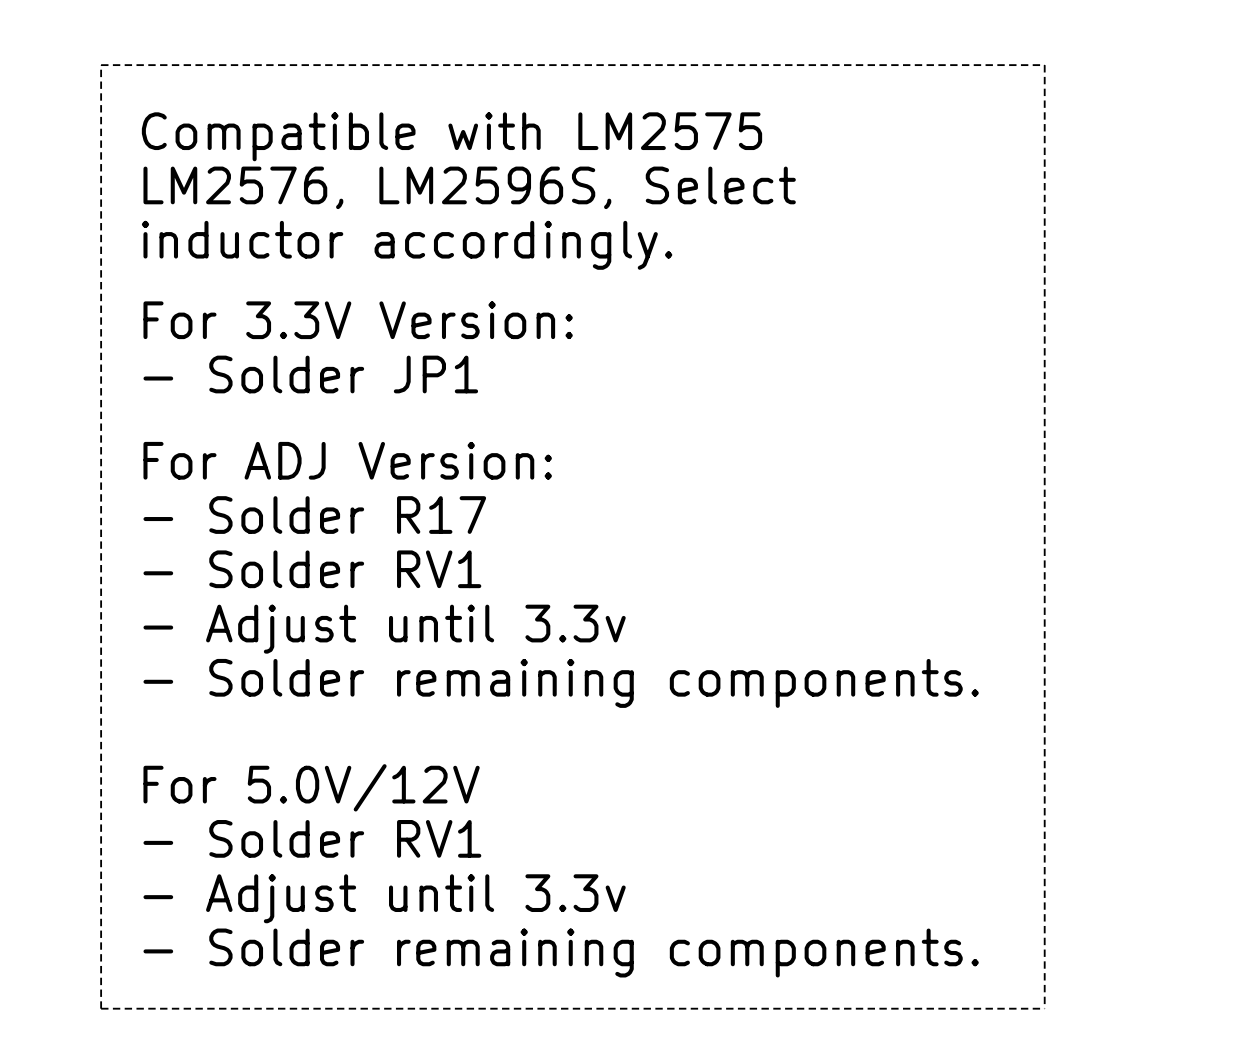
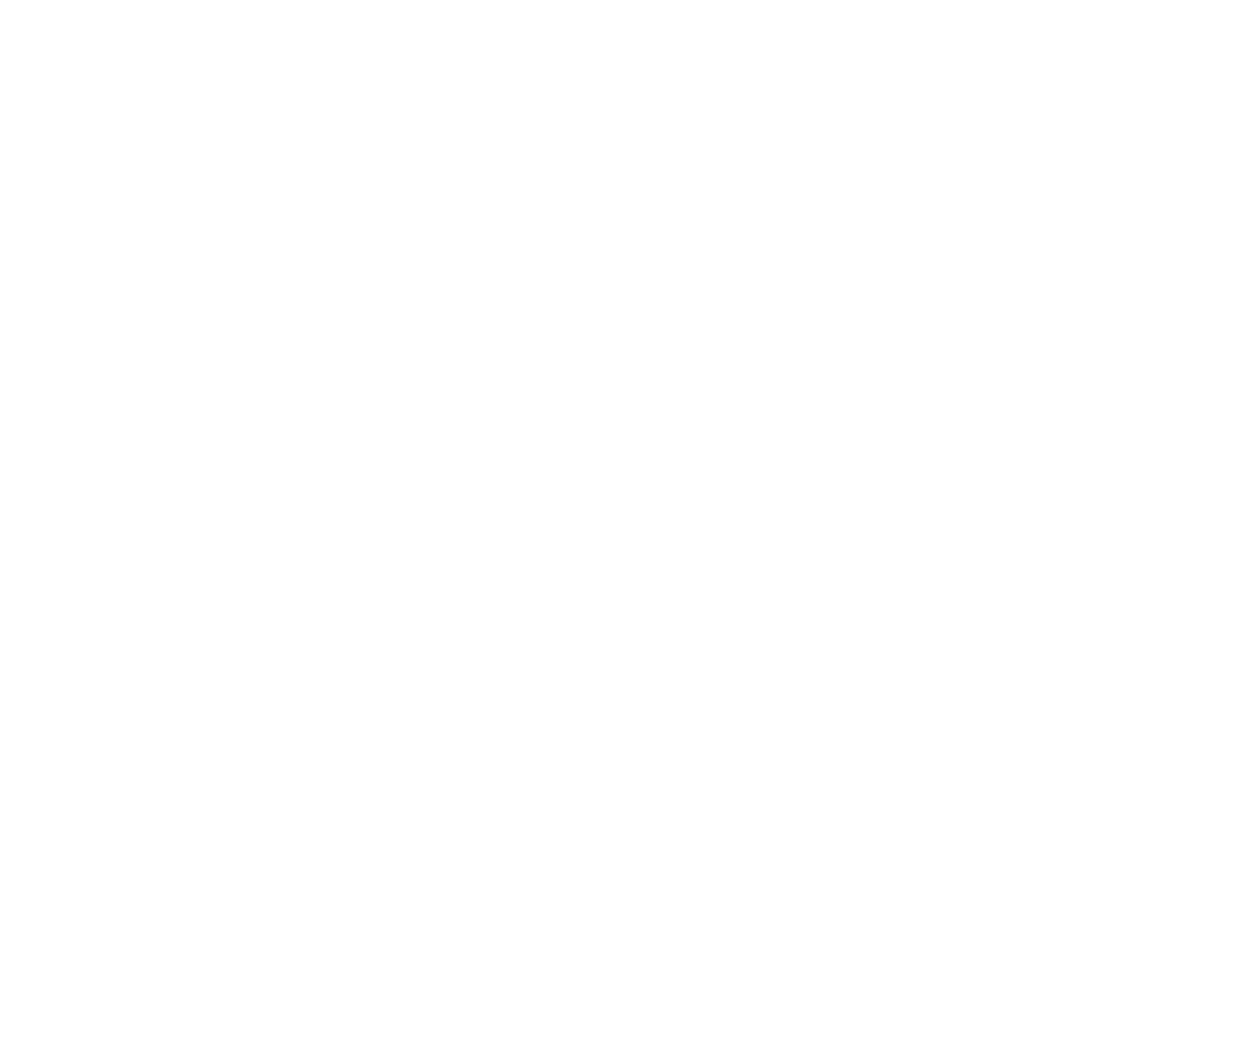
line: (101, 65) (101, 1008) (1044, 1008) (1044, 65) (101, 65) -> none
text: Compatible with LM2575 (452, 136) -> none
text: LM2576, LM2596S, Select (469, 187) -> none
text: inductor accordingly. (407, 245) -> none
text: For 3.3V Version: (358, 320) -> none
text: - Solder JP1 (310, 374) -> none
text: For ADJ Version: (347, 460) -> none
text: - Solder R17 (314, 515) -> none
text: - Solder RV1 (312, 569) -> none
text: - Adjust until 3.3v (384, 629) -> none
text: - Solder remaining components. (561, 683) -> none
text: For 5.0V/12V (311, 787) -> none
text: - Solder RV1 (312, 838) -> none
text: - Adjust until 3.3v (384, 898) -> none
text: - Solder remaining components. (561, 953) -> none

